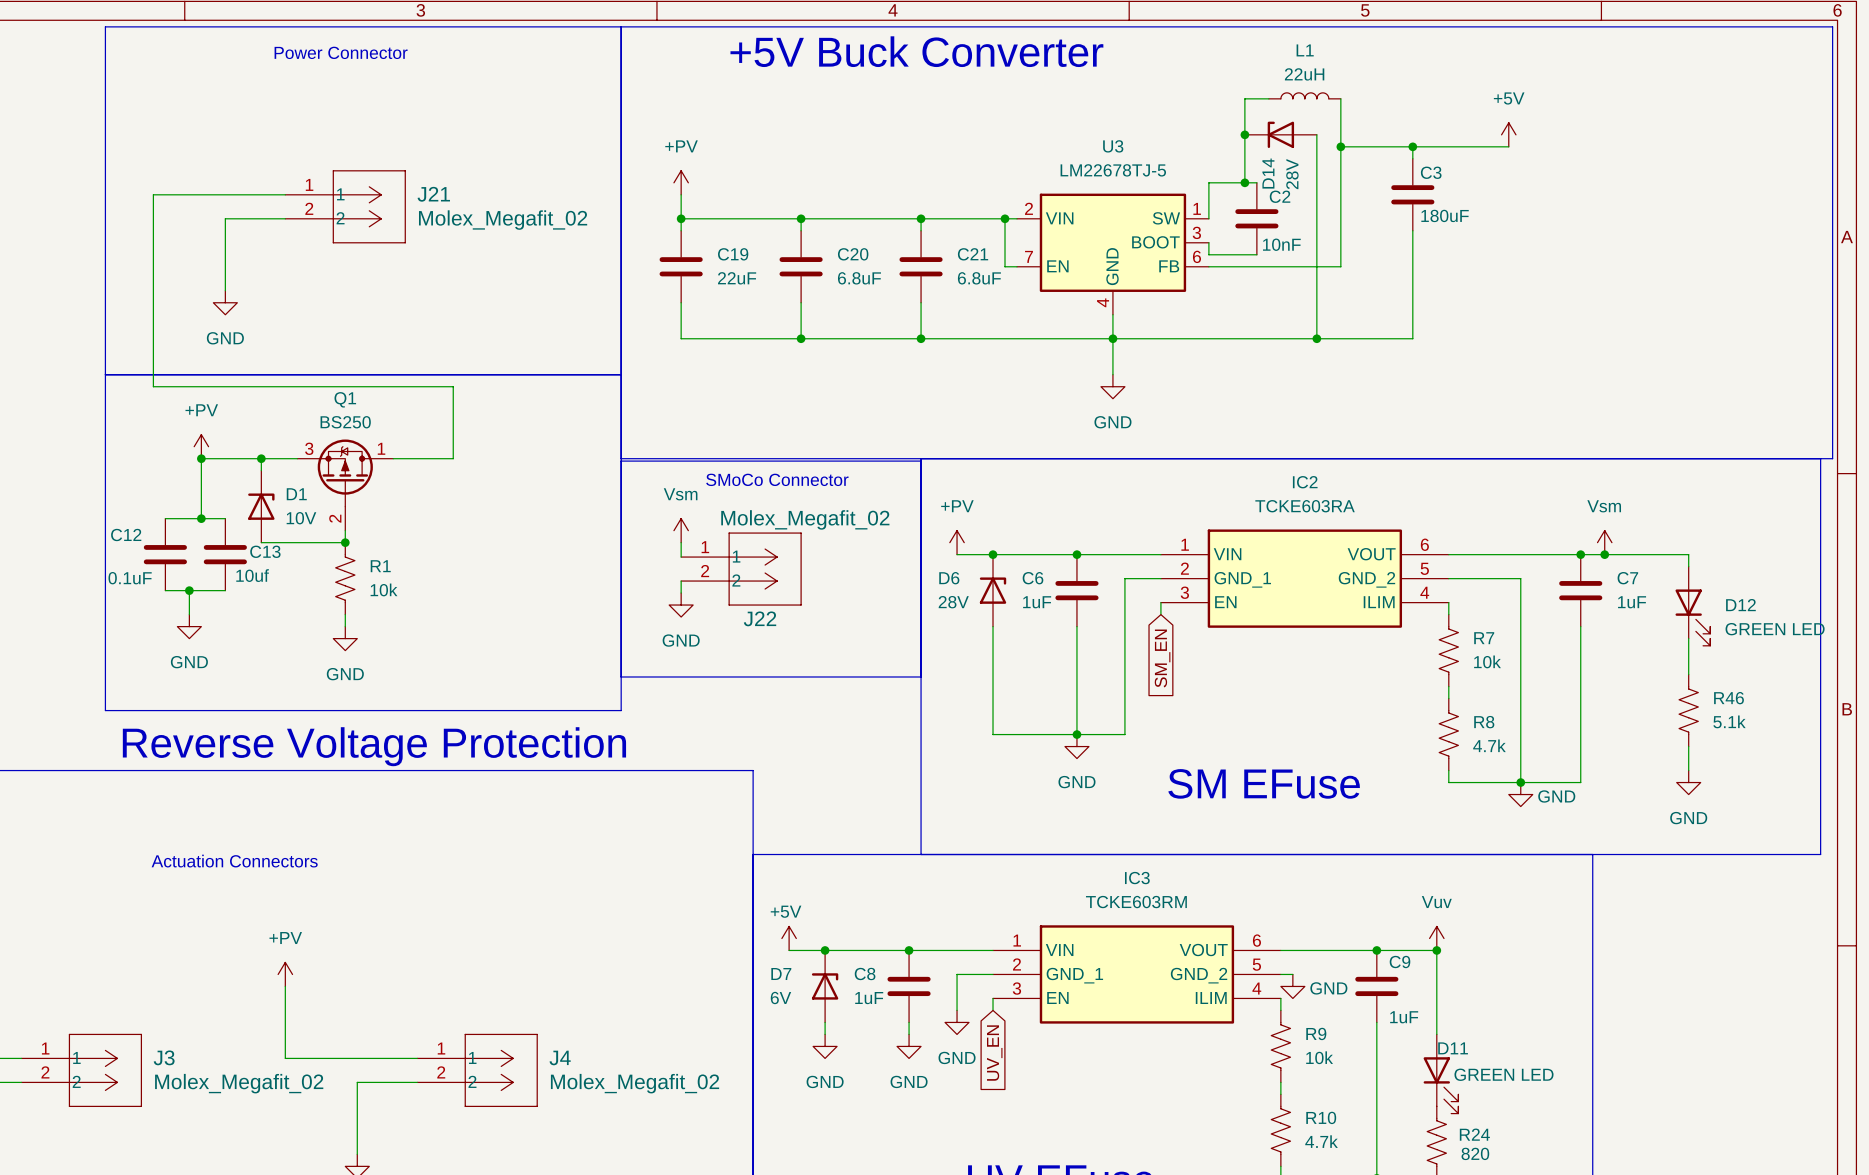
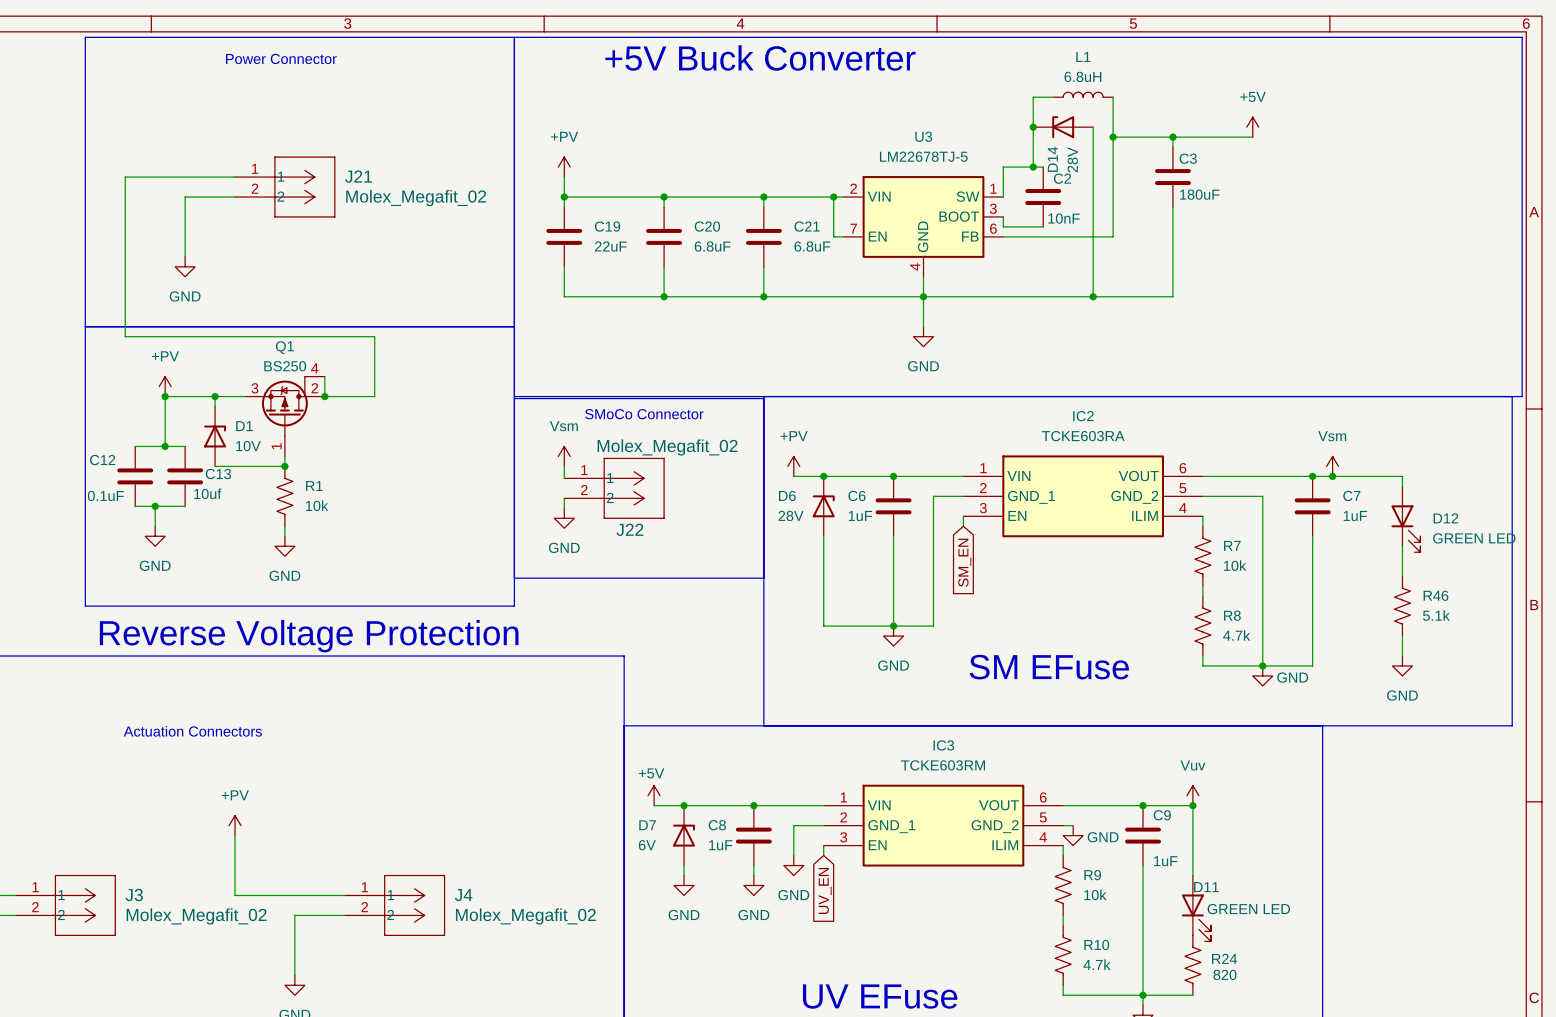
L1 value: 22uH (1304, 74) -> 6.8uH (1082, 76)
wire: none -> (324, 376) (324, 396)
Q1 symbol: [297, 439, 394, 531] -> [244, 376, 325, 457]
junction: none -> (324, 396)

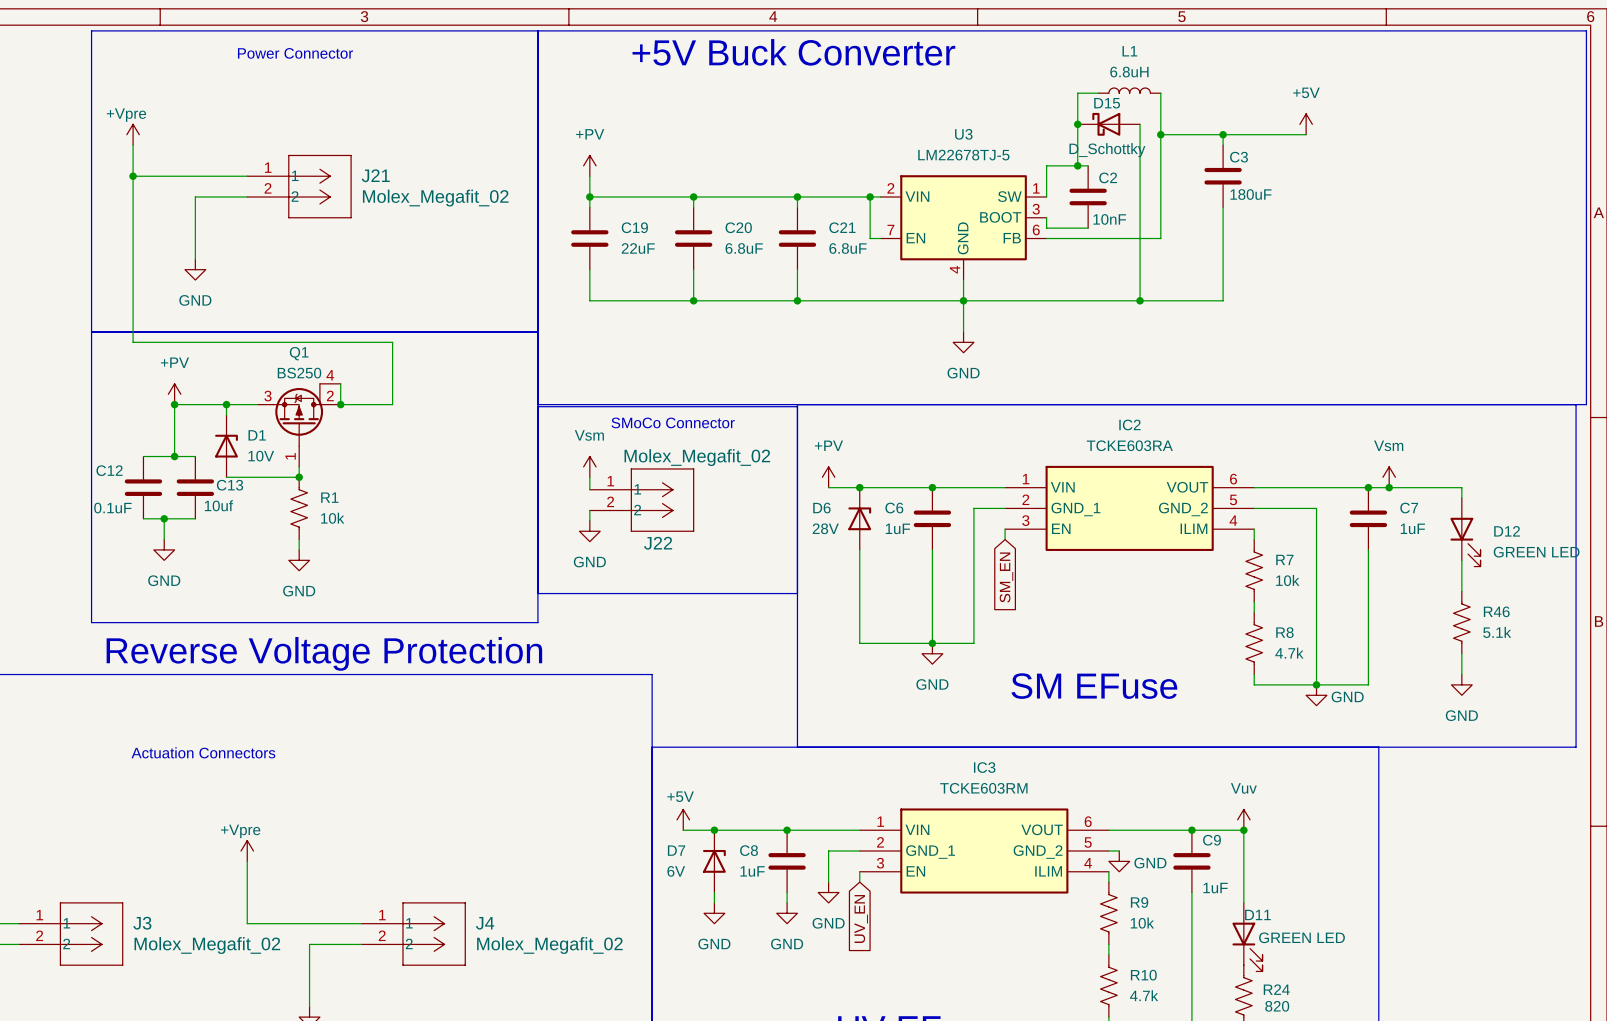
D14: 28V (1063, 127) -> none
D15: none -> D_Schottky (1108, 124)
power symbol: none -> +Vpre (133, 134)
wire: none -> (133, 145) (133, 176)
junction: none -> (133, 176)
power symbol: +PV (235, 825) -> +Vpre (247, 851)

